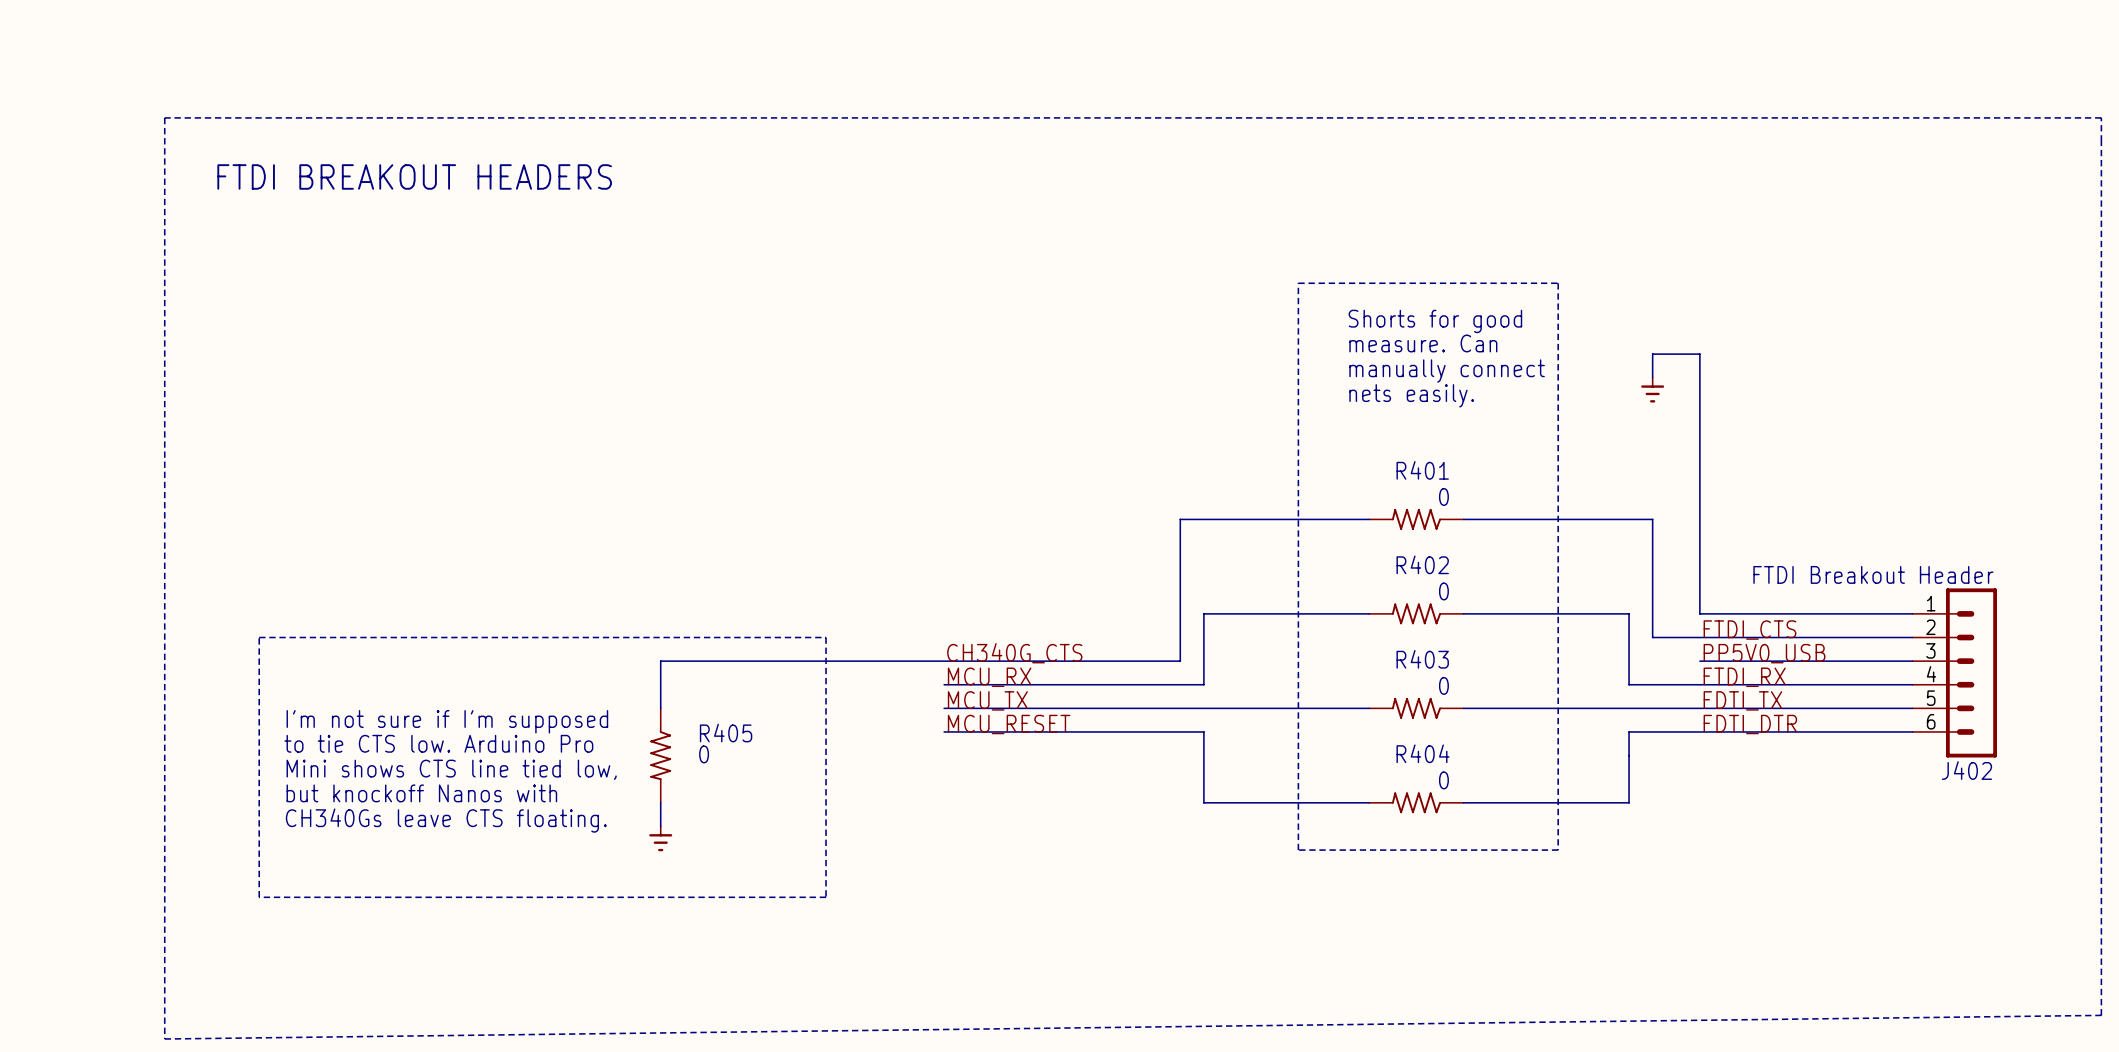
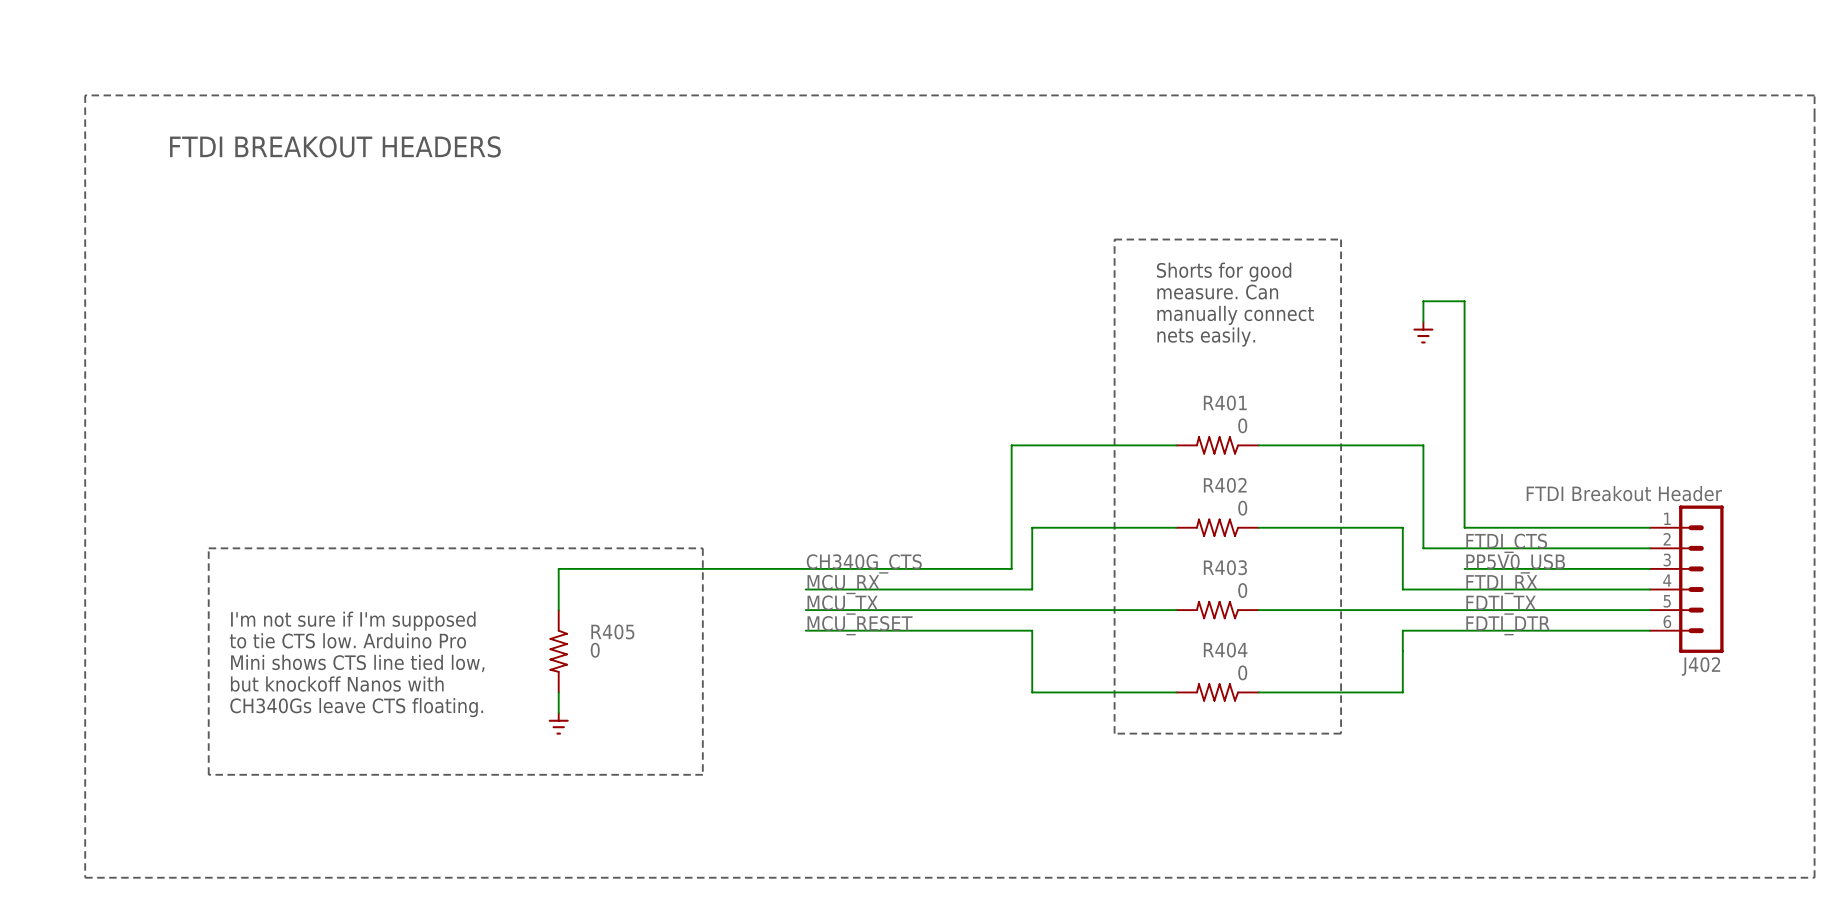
line: (164, 117) (164, 1039) (2101, 1015) -> (126, 95) (85, 95) (85, 877) (1814, 877)

